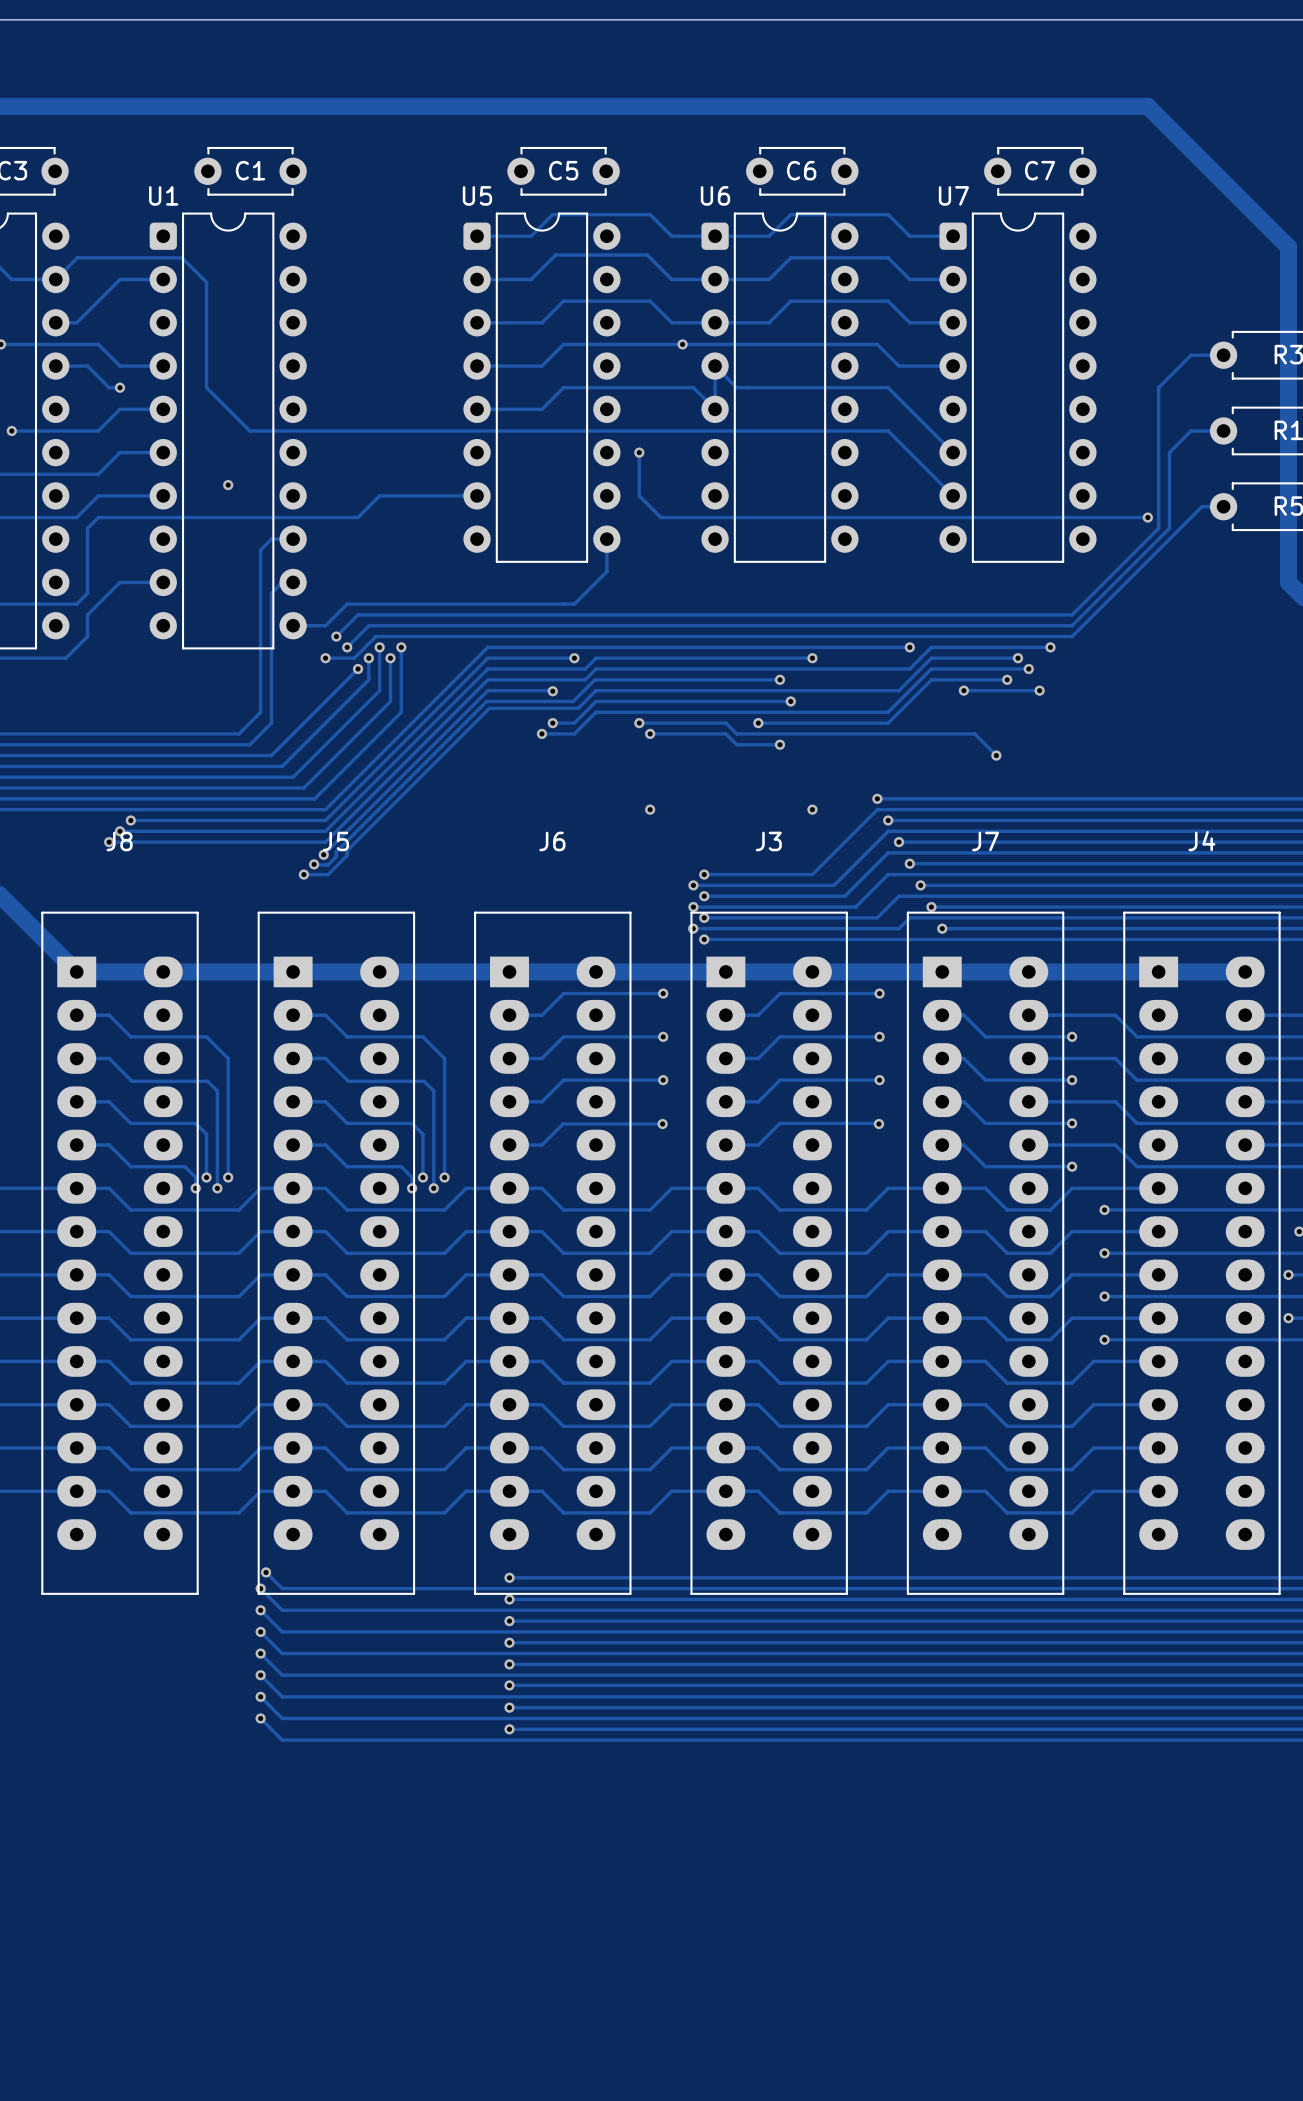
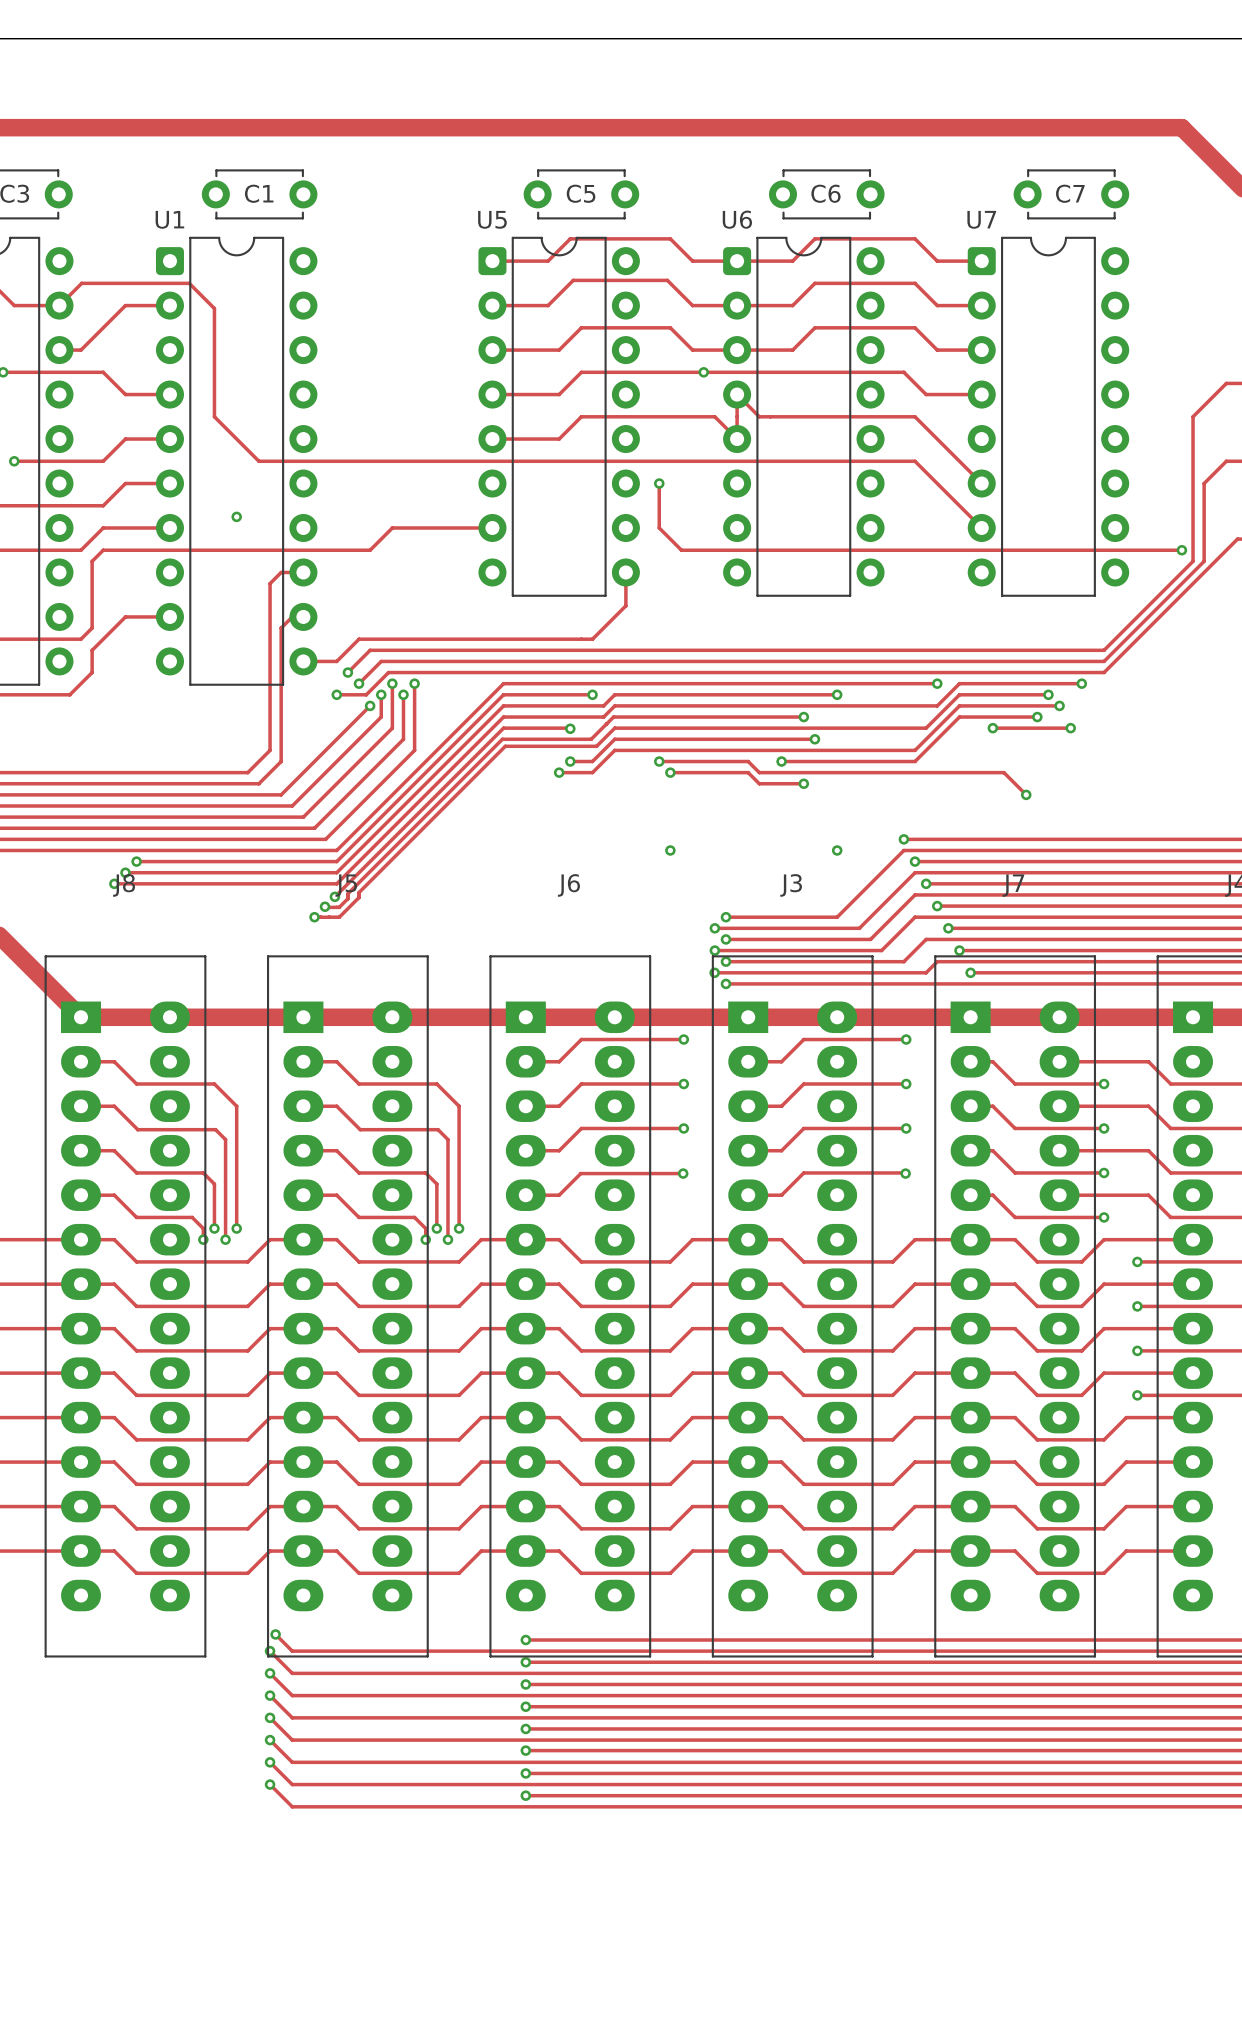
track: (55, 366) (87, 366) (109, 387) (120, 387) -> none
via: (120, 387) -> none

